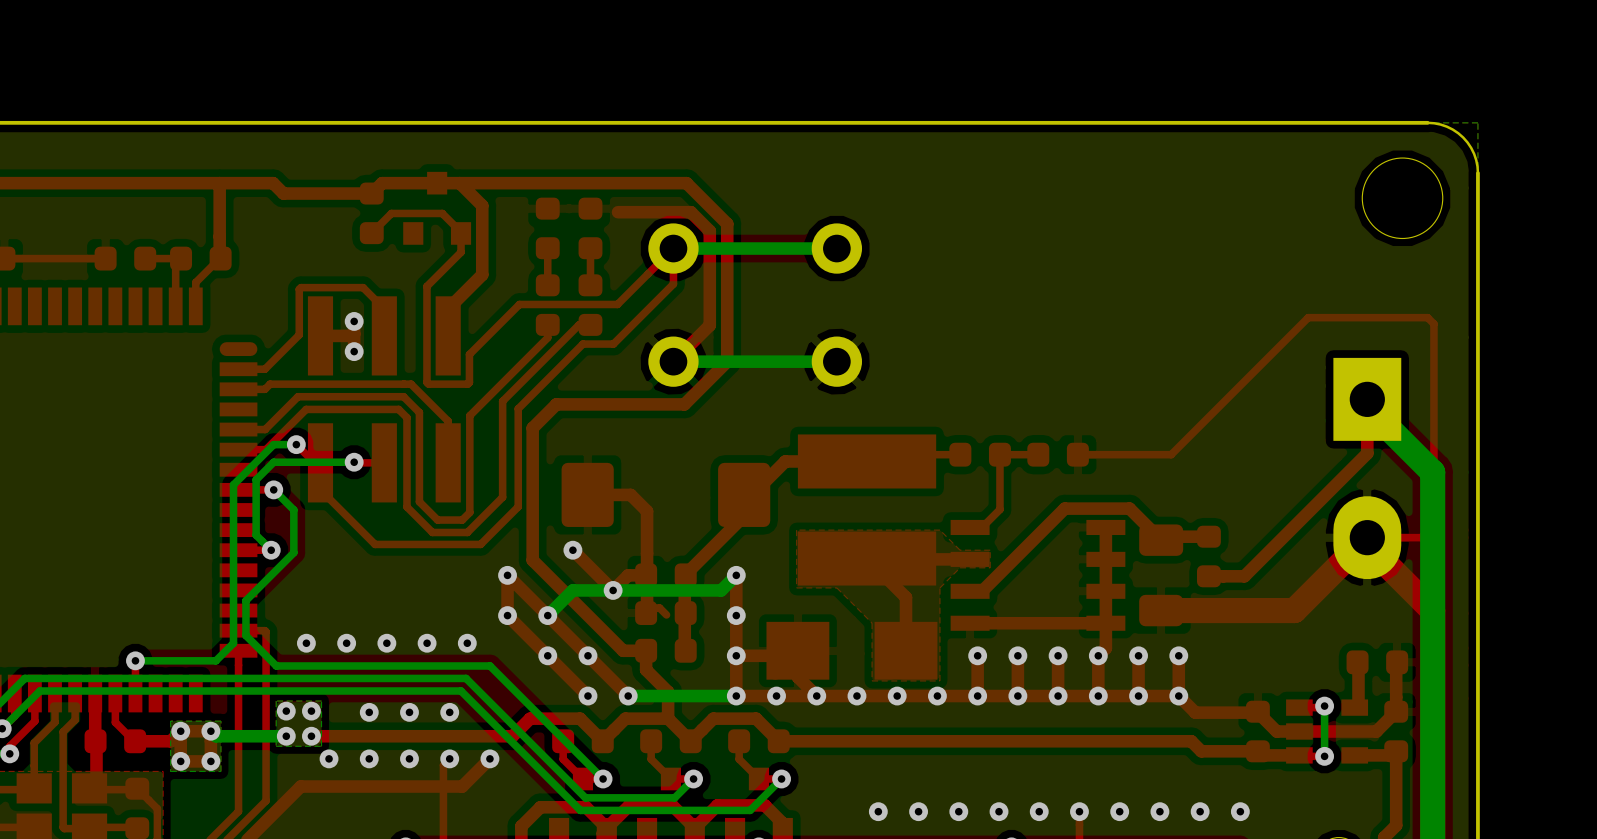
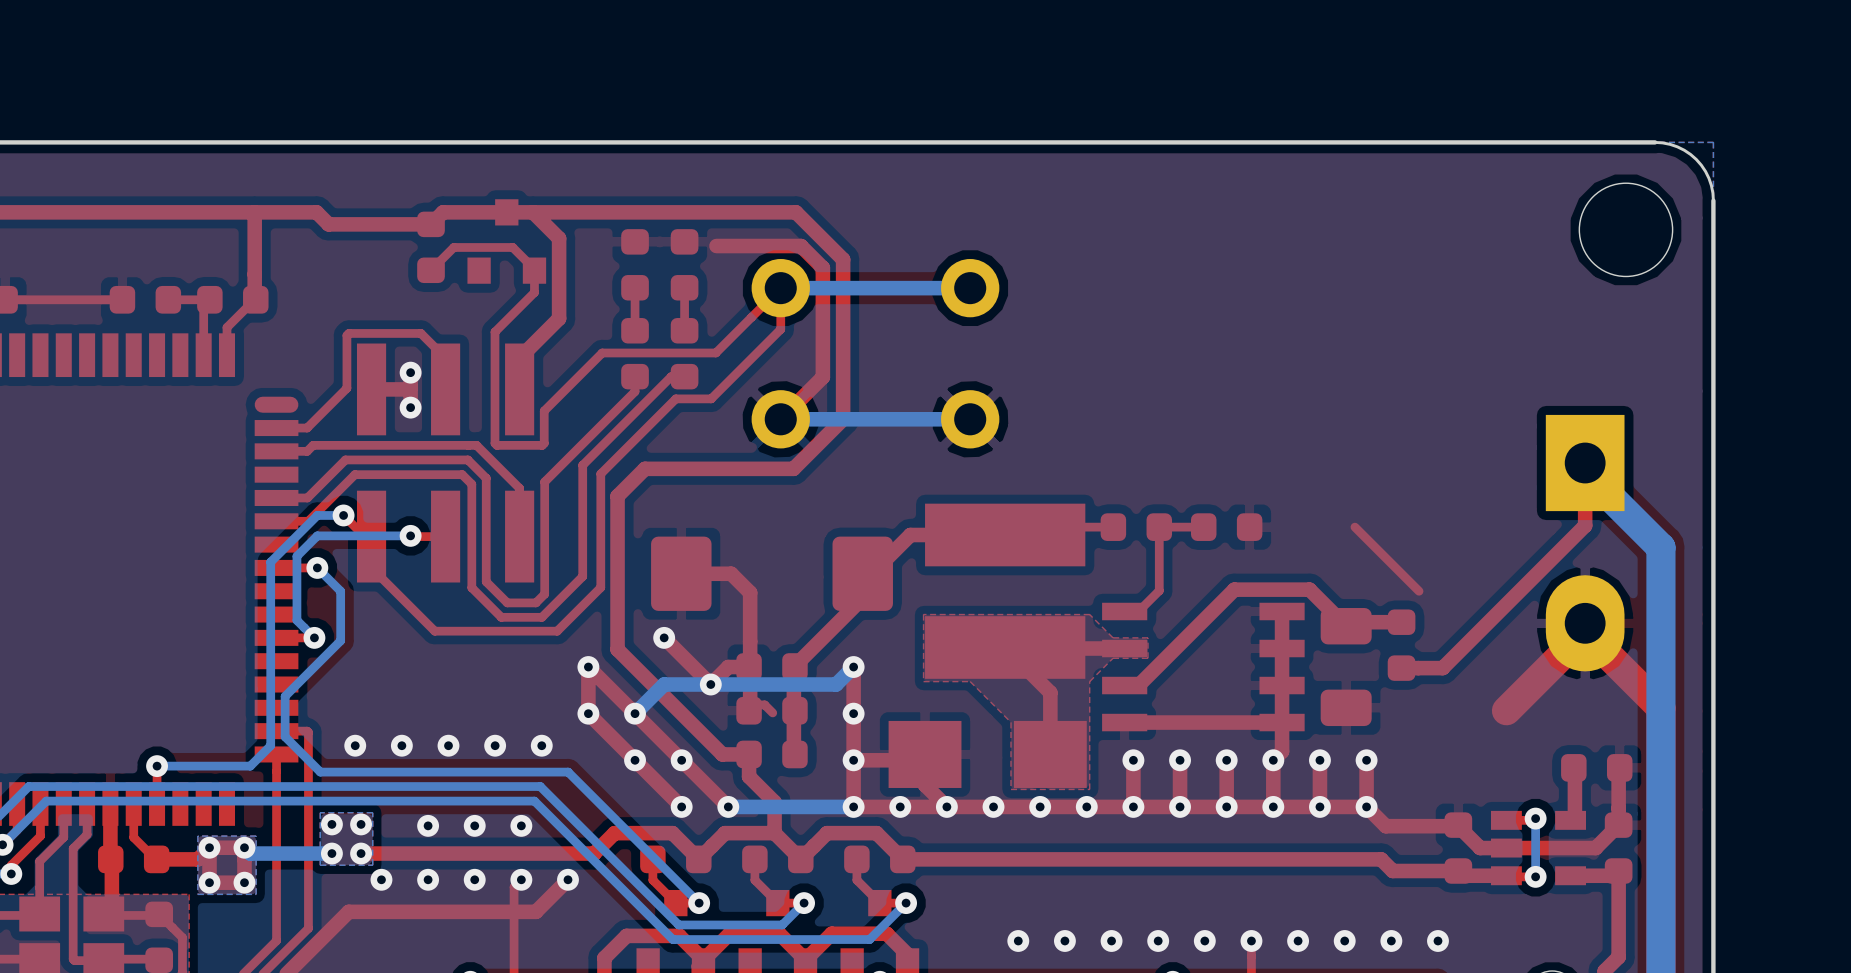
top track: (1077, 454) (1171, 454) (1308, 317) (1427, 317) (1433, 323) (1433, 525) (1421, 537) (1367, 537) (1294, 610) (1161, 610) -> none
top track: none -> (1354, 527) (1419, 591)
top track: none -> (1585, 632) (1506, 710)

